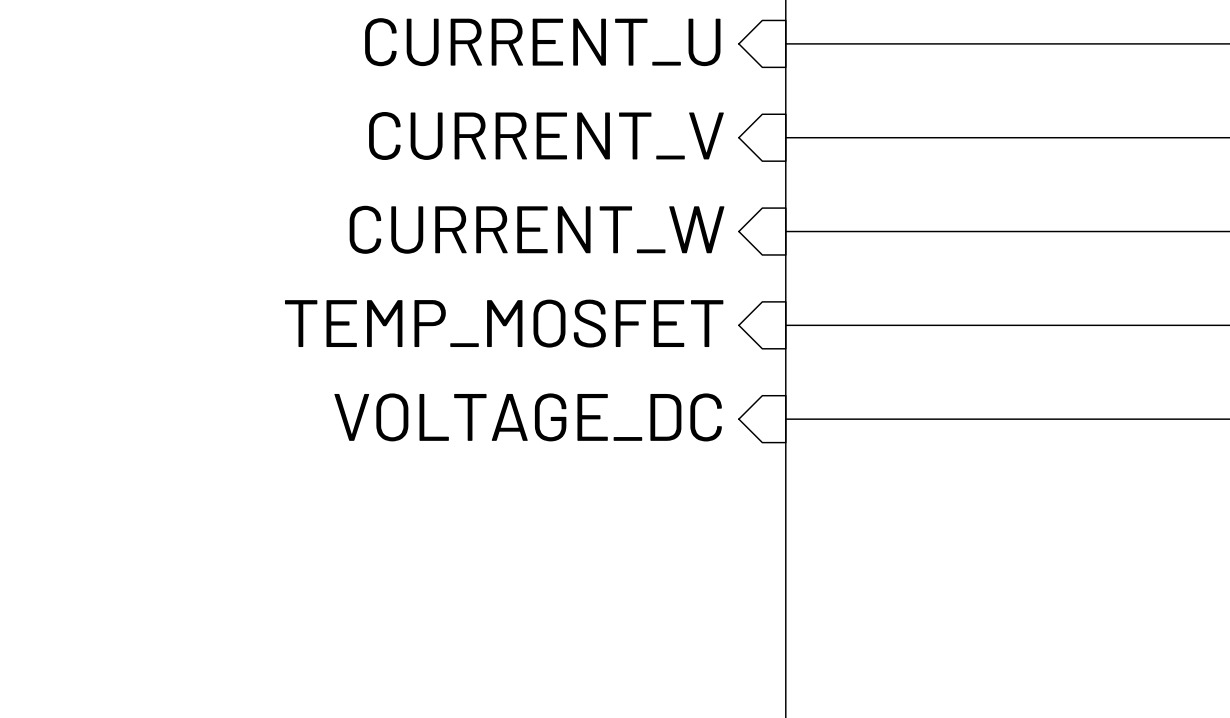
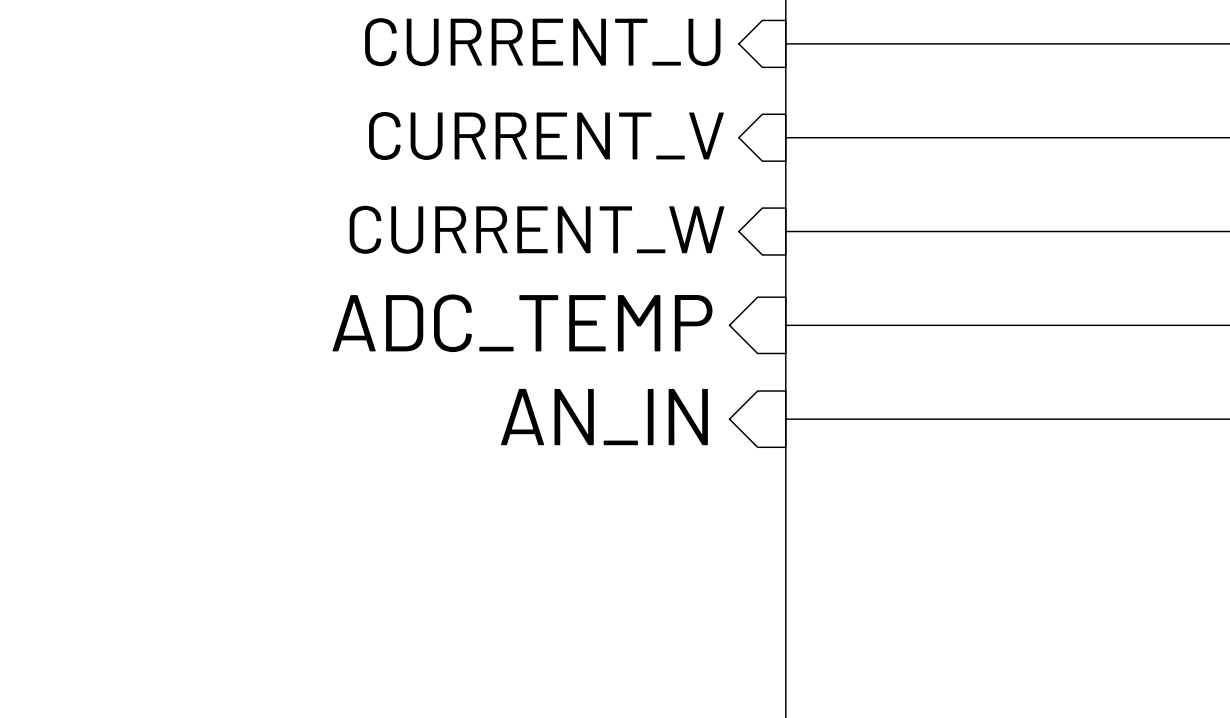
sheet pin: TEMP_MOSFET (504, 323) -> ADC_TEMP (522, 323)
sheet pin: VOLTAGE_DC (528, 417) -> AN_IN (604, 417)

